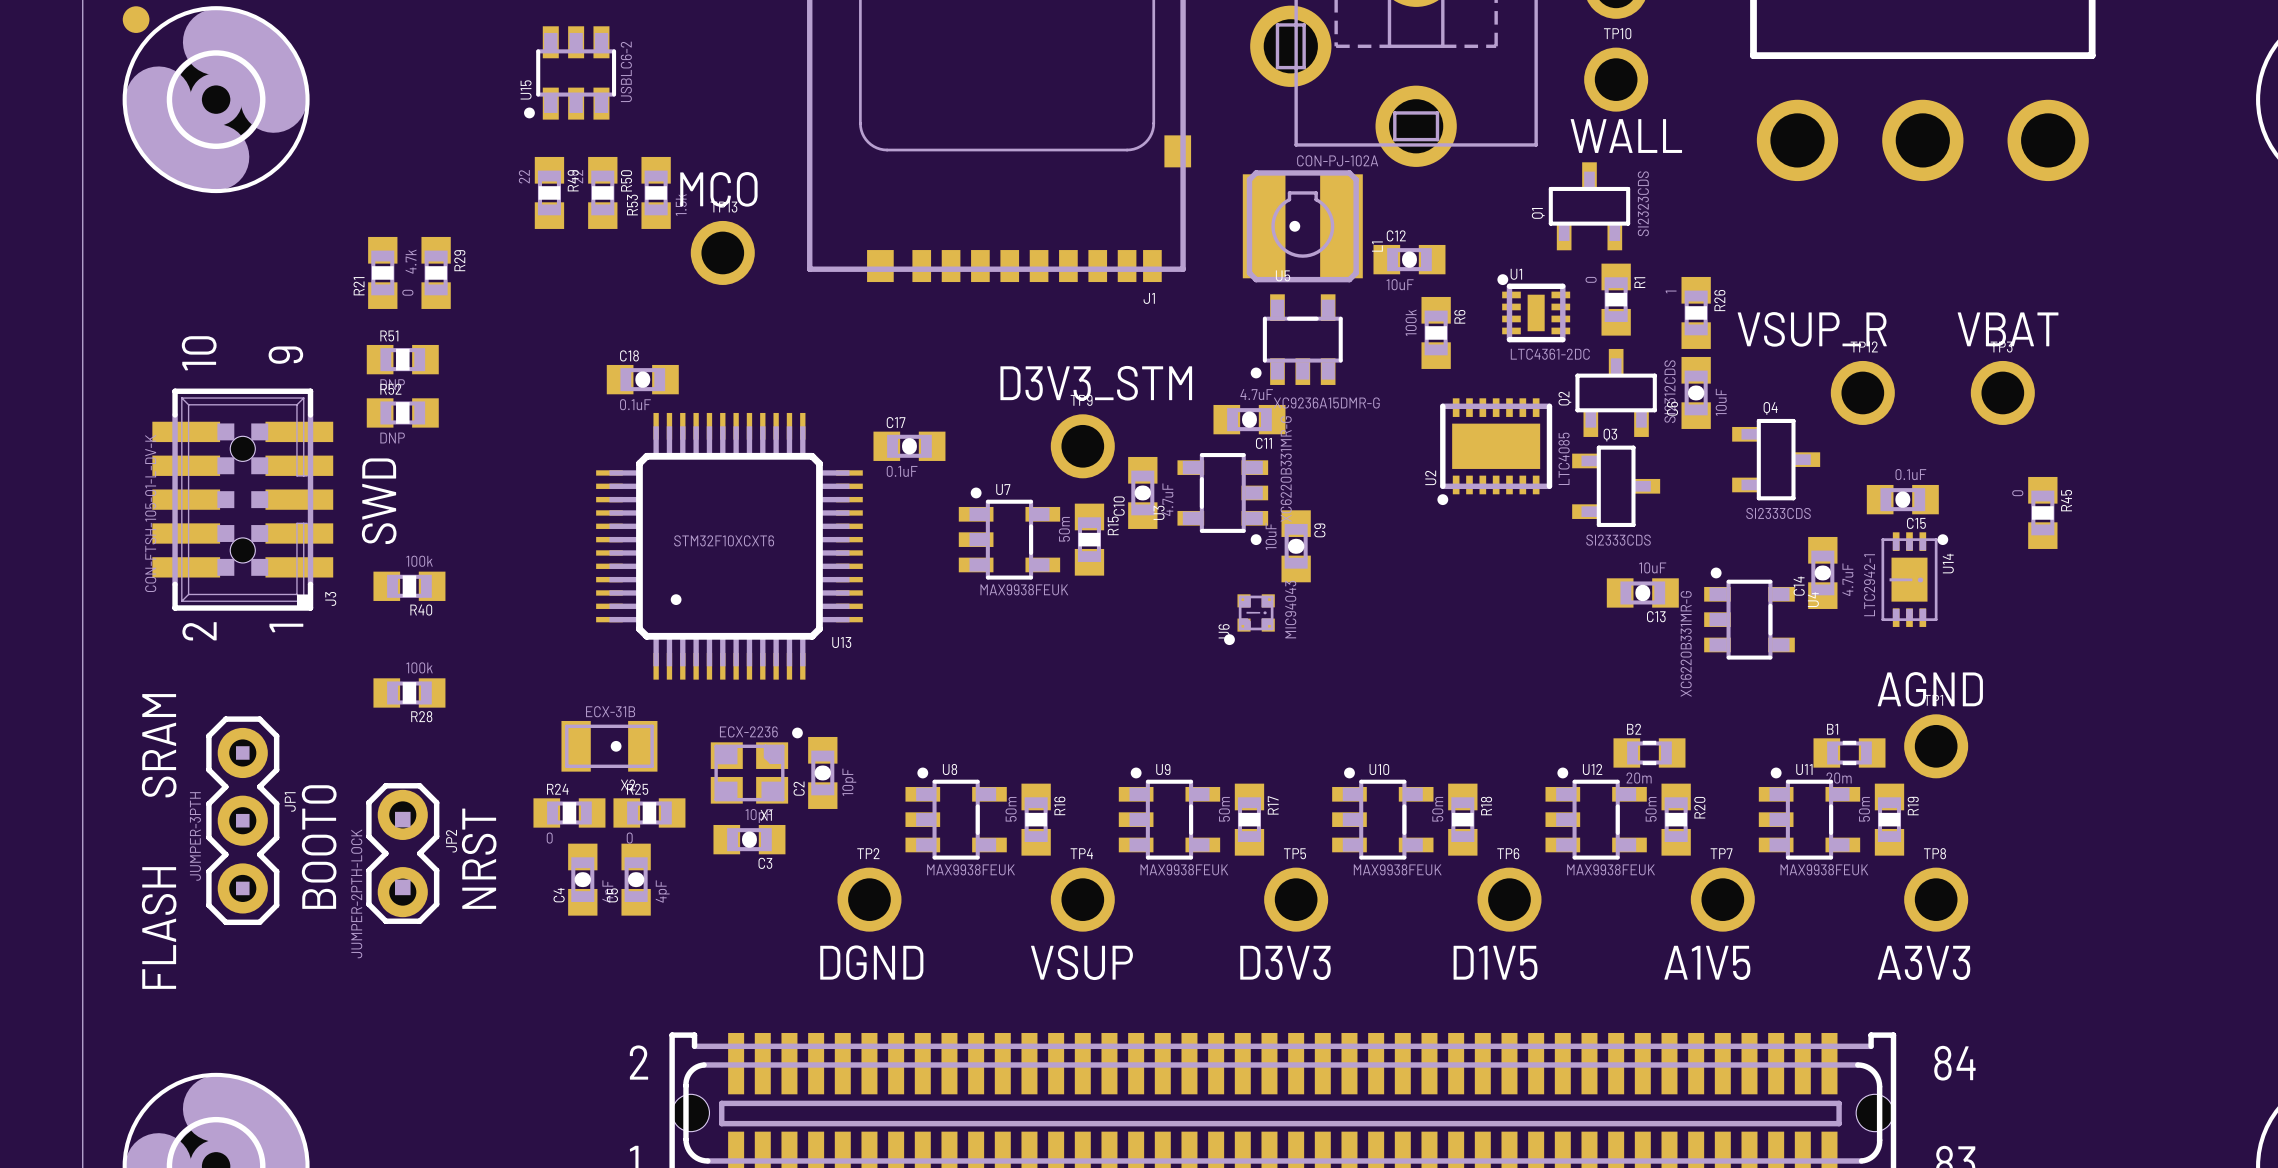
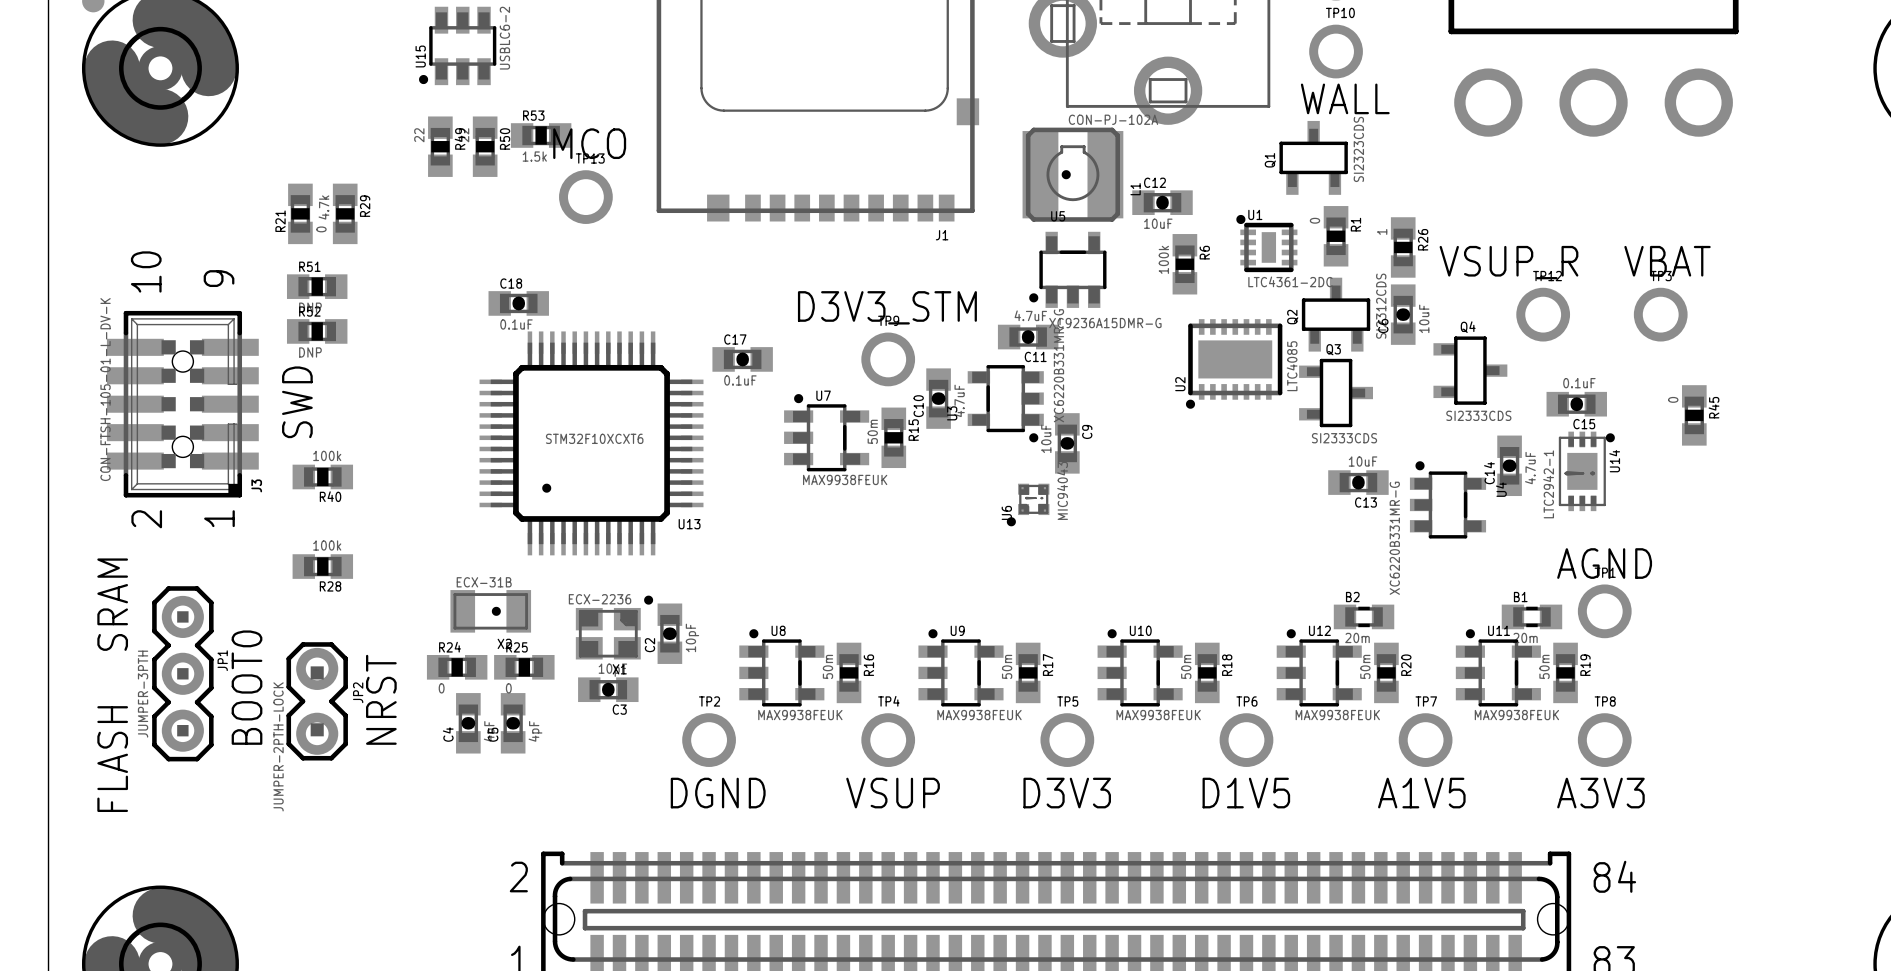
R53 rotation: 0° (656, 192) -> 90° clockwise (541, 135)

